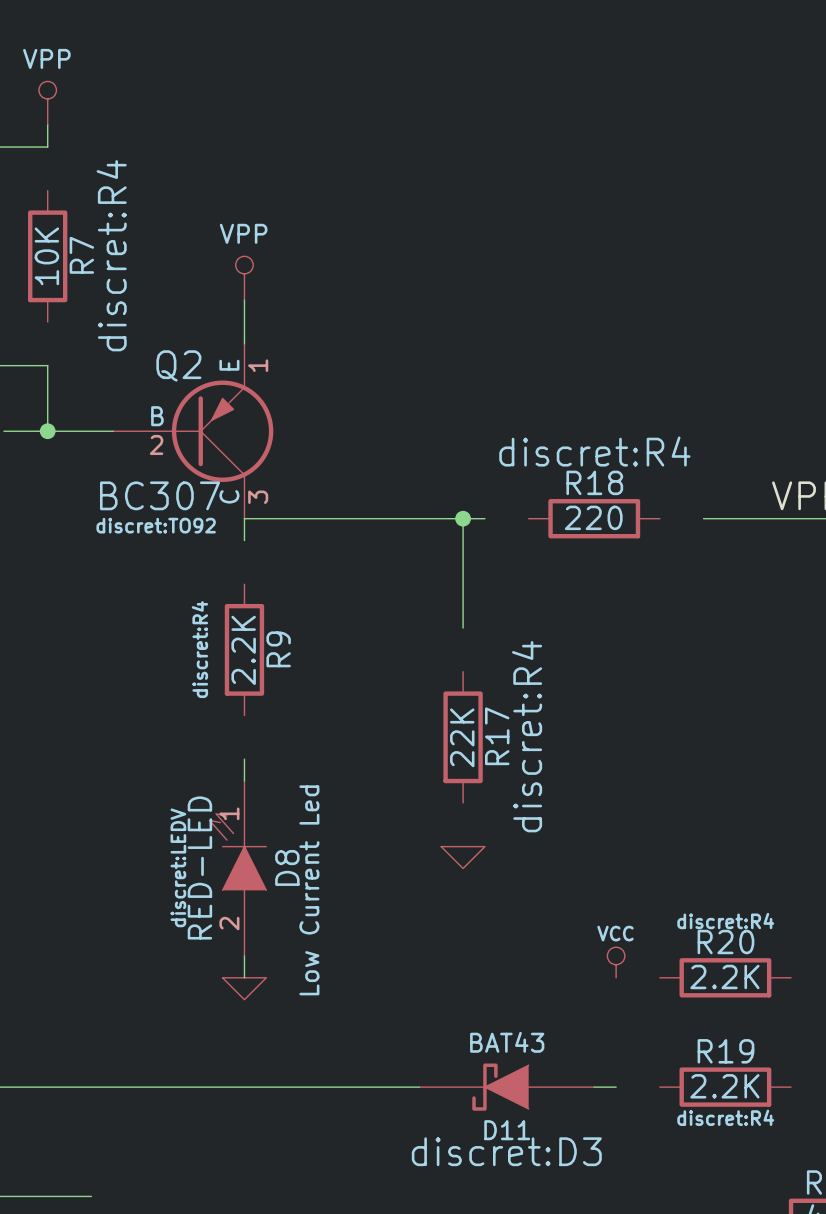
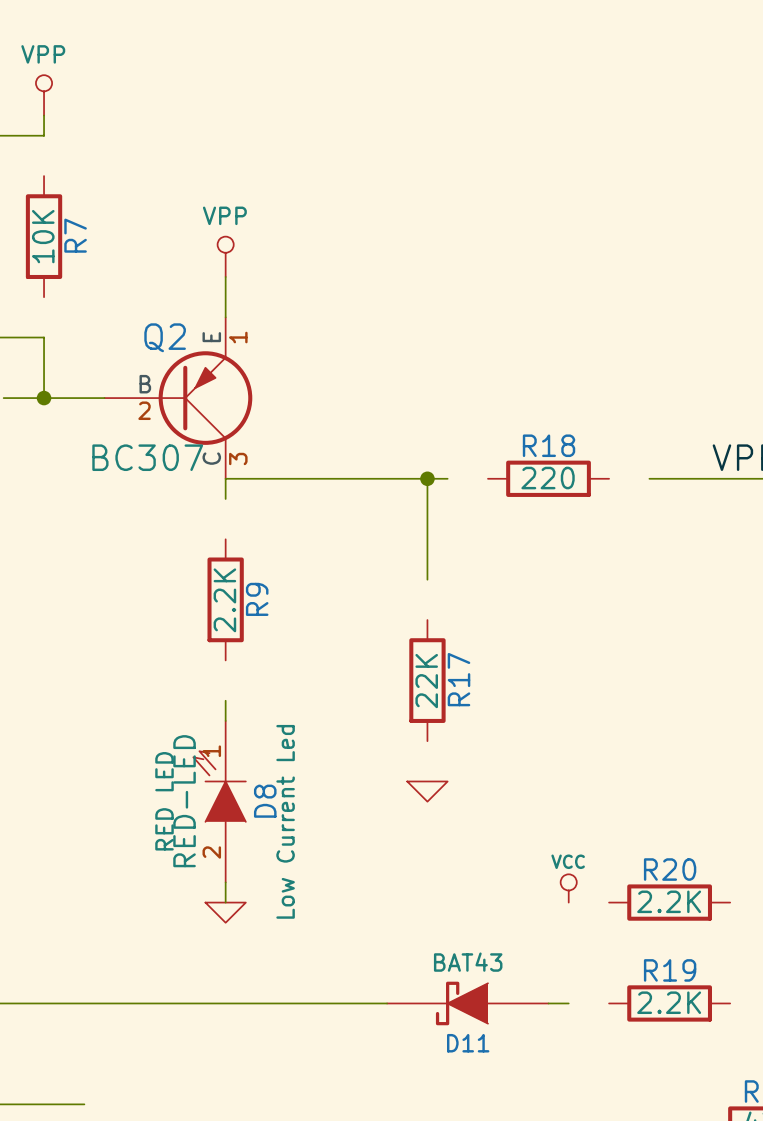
R7 text: discret:R4 (111, 255) -> none
R18 text: discret:R4 (594, 451) -> none
Q2 text: discret:TO92 (156, 525) -> none
R9 text: discret:R4 (199, 649) -> none
R17 text: discret:R4 (527, 736) -> none
D8 text: discret:LEDV (178, 867) -> none
D8 text: none -> RED LED (164, 801)
R20 text: discret:R4 (725, 921) -> none
R19 text: discret:R4 (725, 1117) -> none
D11 text: discret:D3 (506, 1151) -> none

